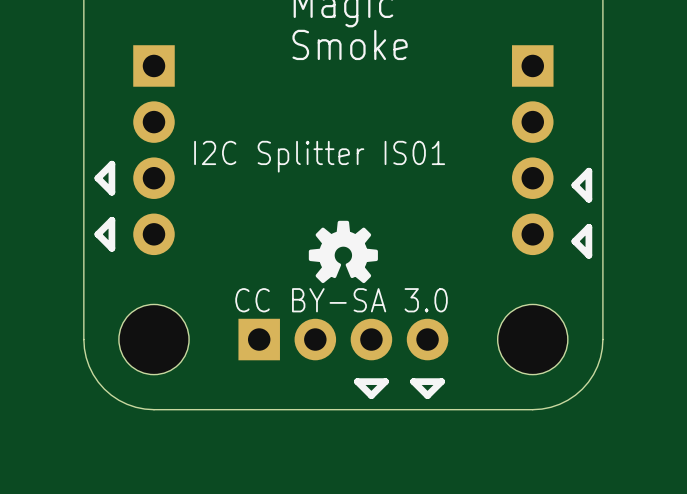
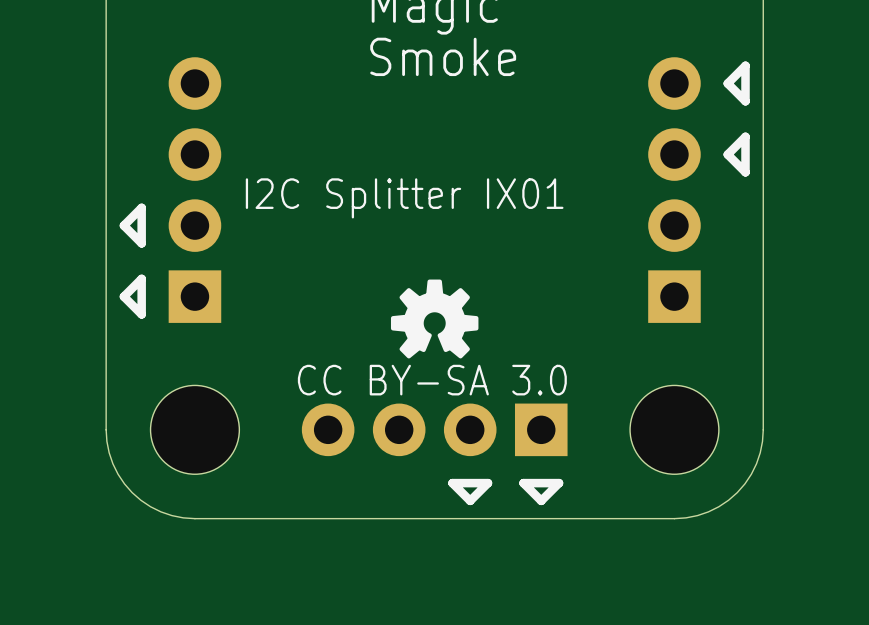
part rotation: 0° (153, 150) -> 180° (194, 190)
part rotation: 0° (532, 150) -> 180° (674, 190)
text: I2C Splitter IS01 (319, 156) -> I2C Splitter IX01 (404, 198)
line: (588, 171) (588, 199) (574, 185) (588, 171) -> (745, 65) (745, 101) (727, 83) (745, 65)
line: (588, 227) (574, 241) (588, 255) (588, 227) -> (745, 136) (727, 154) (745, 172) (745, 136)
part rotation: 0° (343, 339) -> 180° (434, 429)

